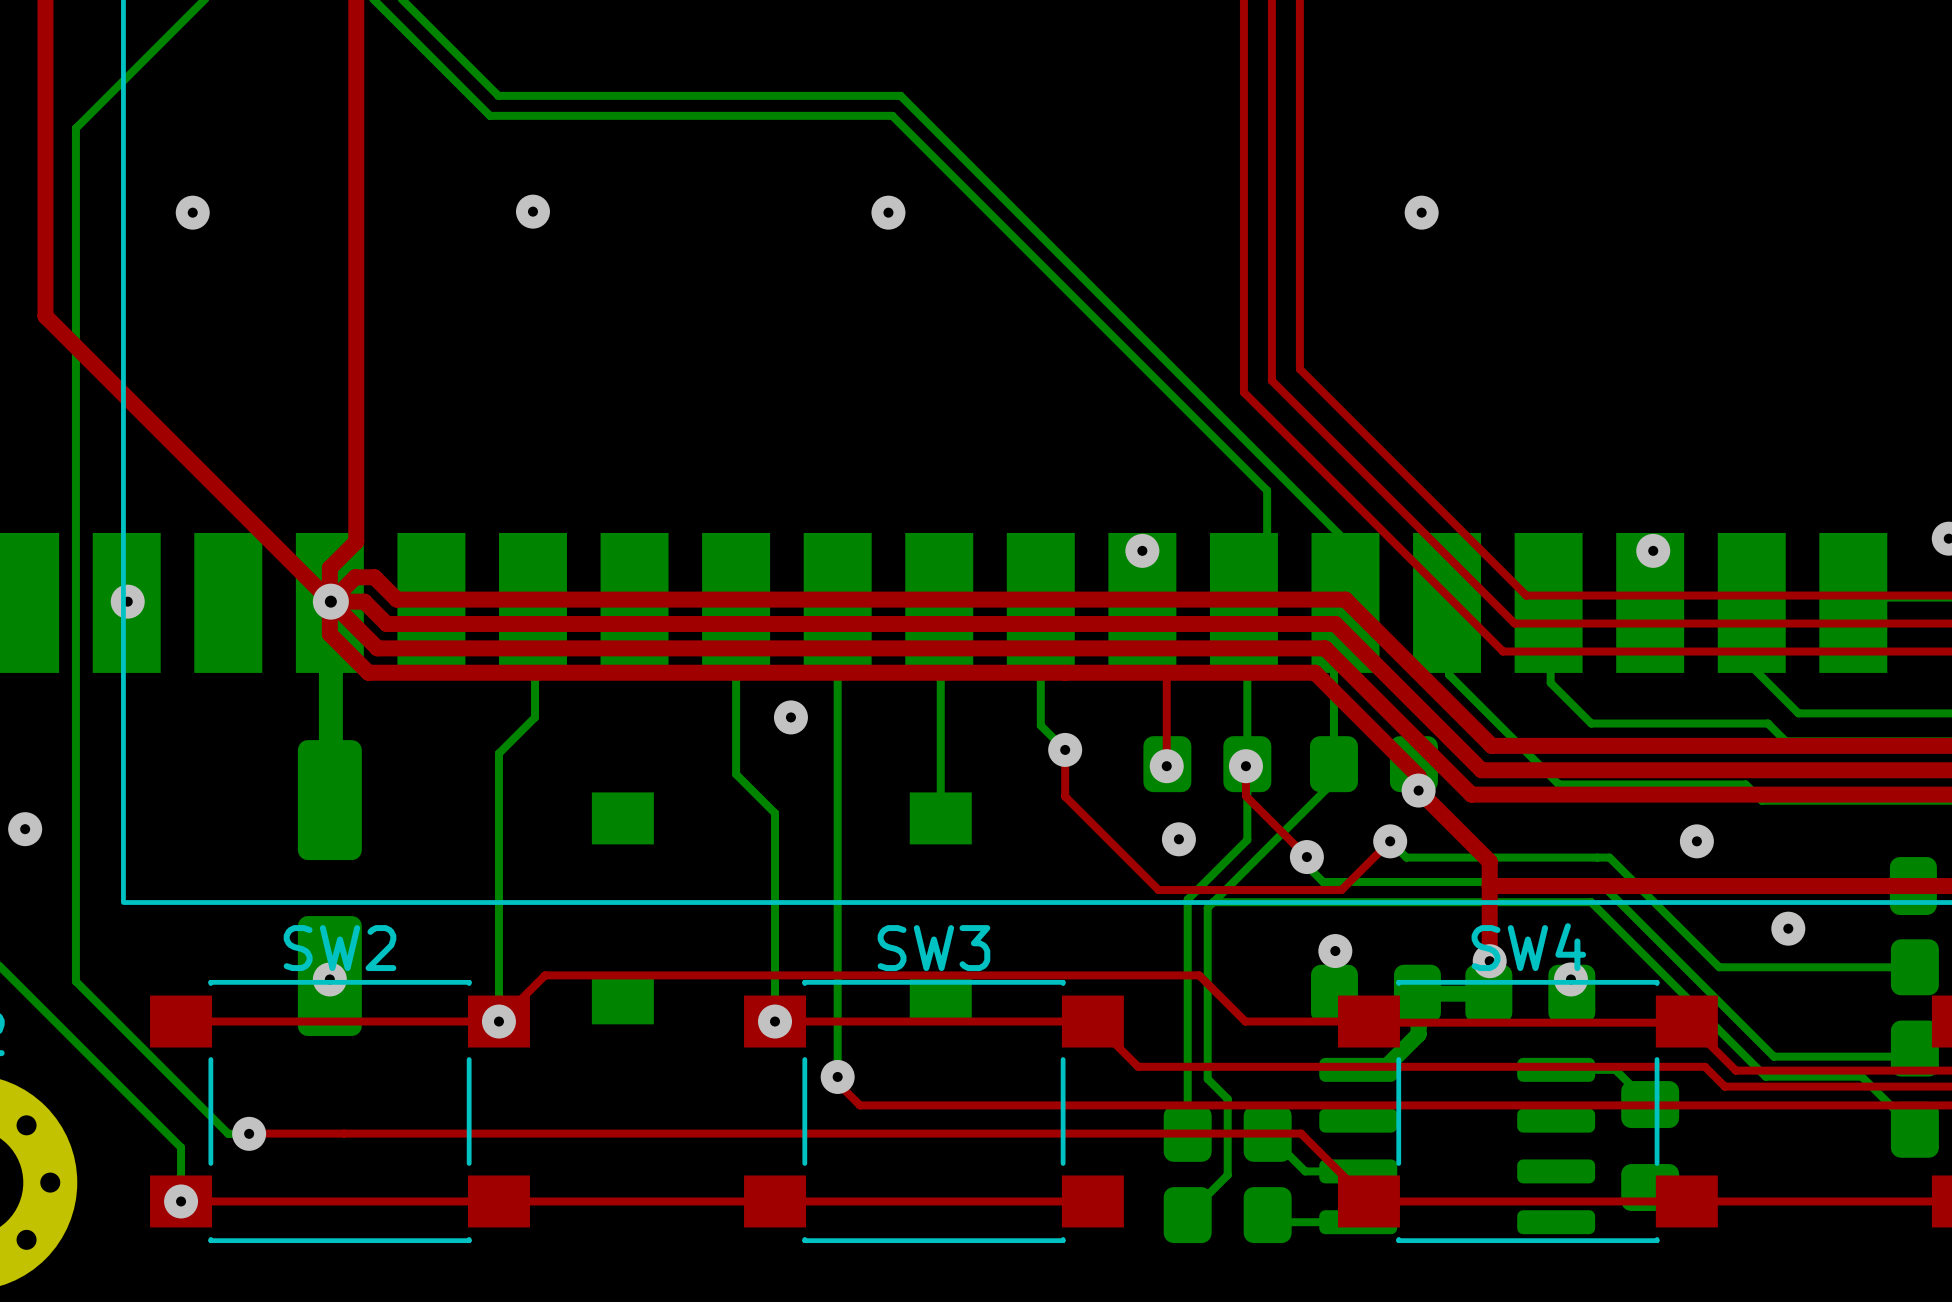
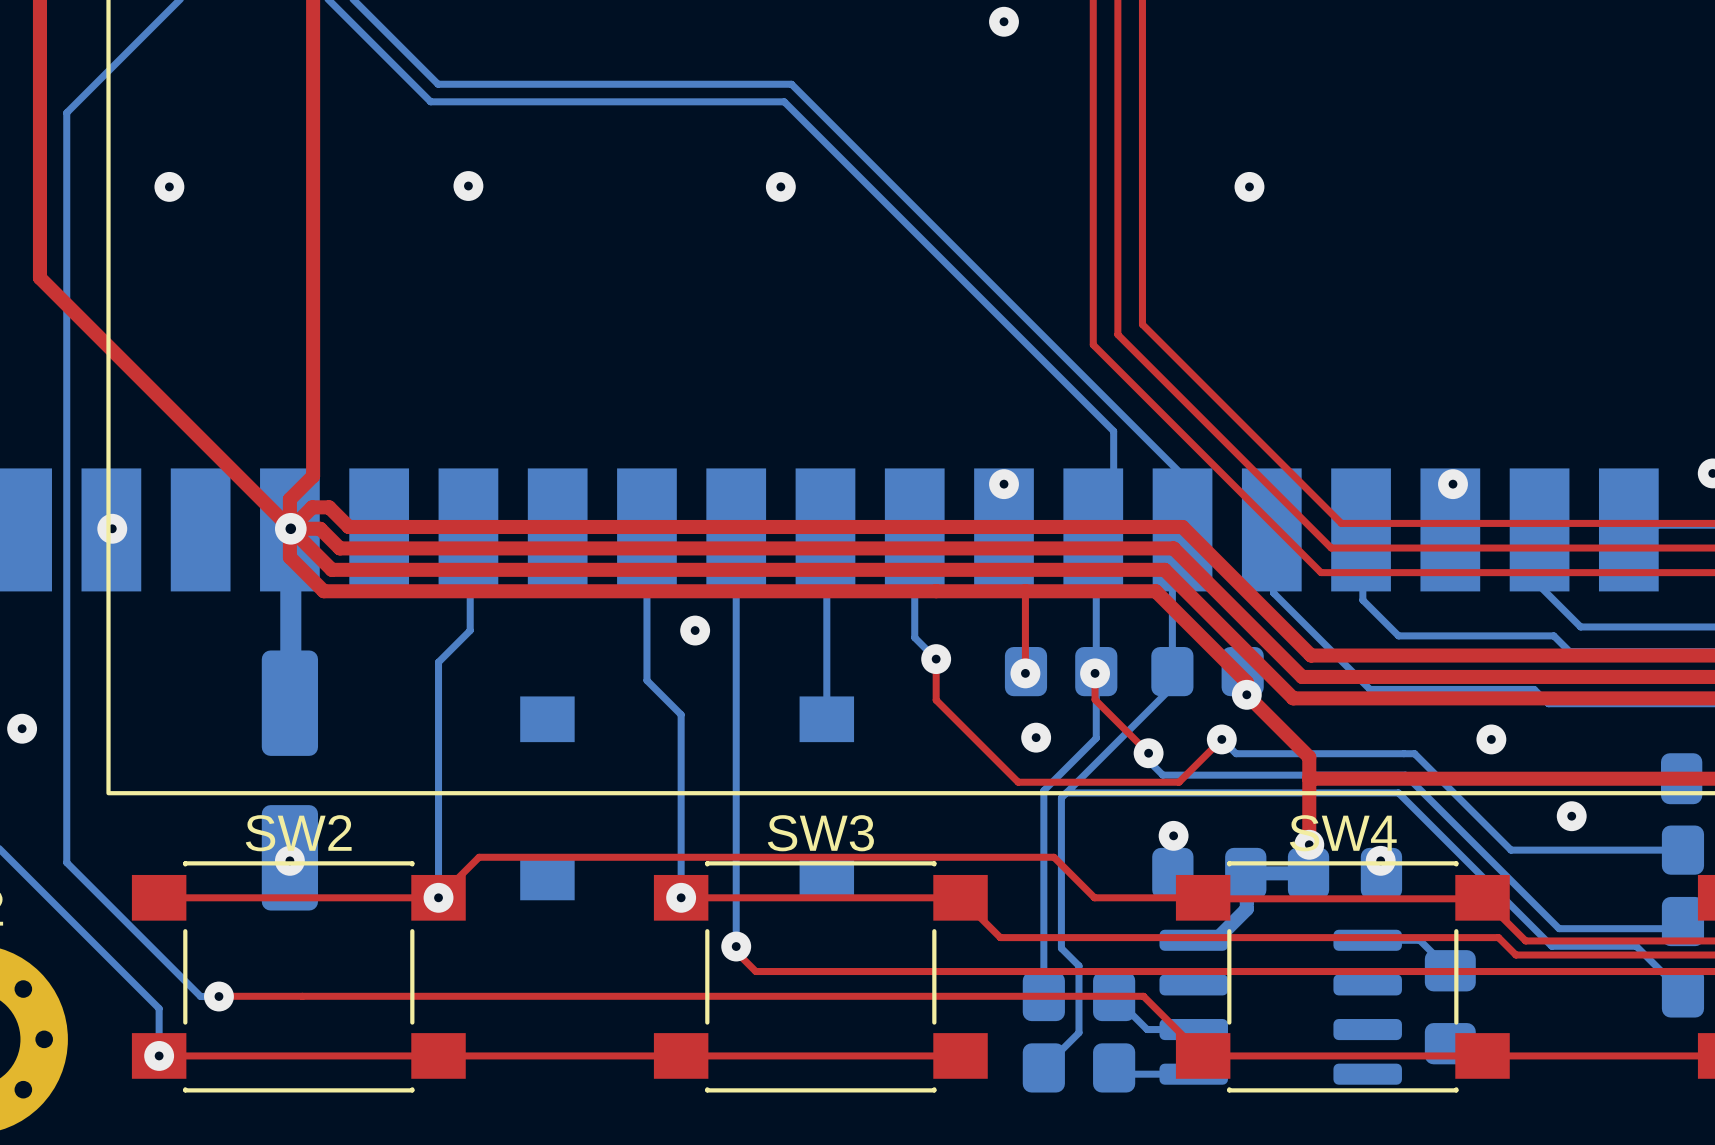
via: none -> (1004, 21)

